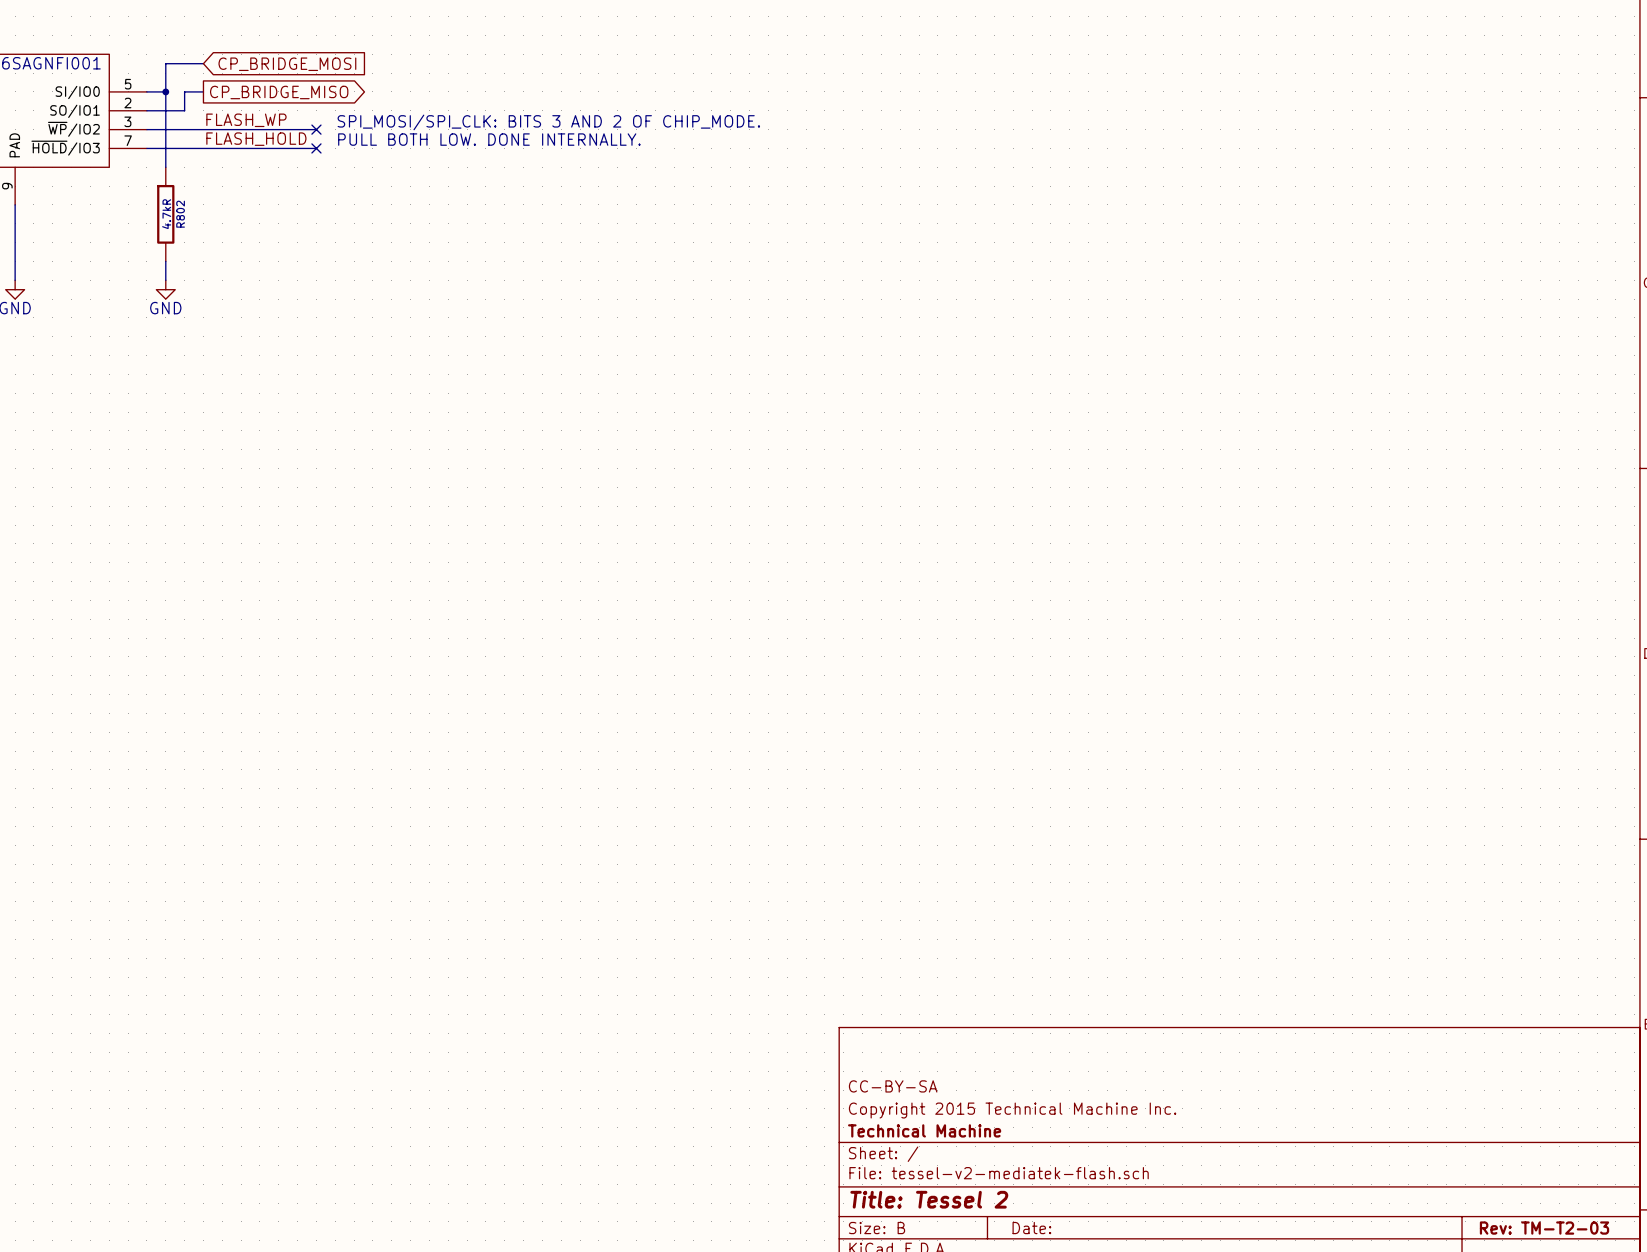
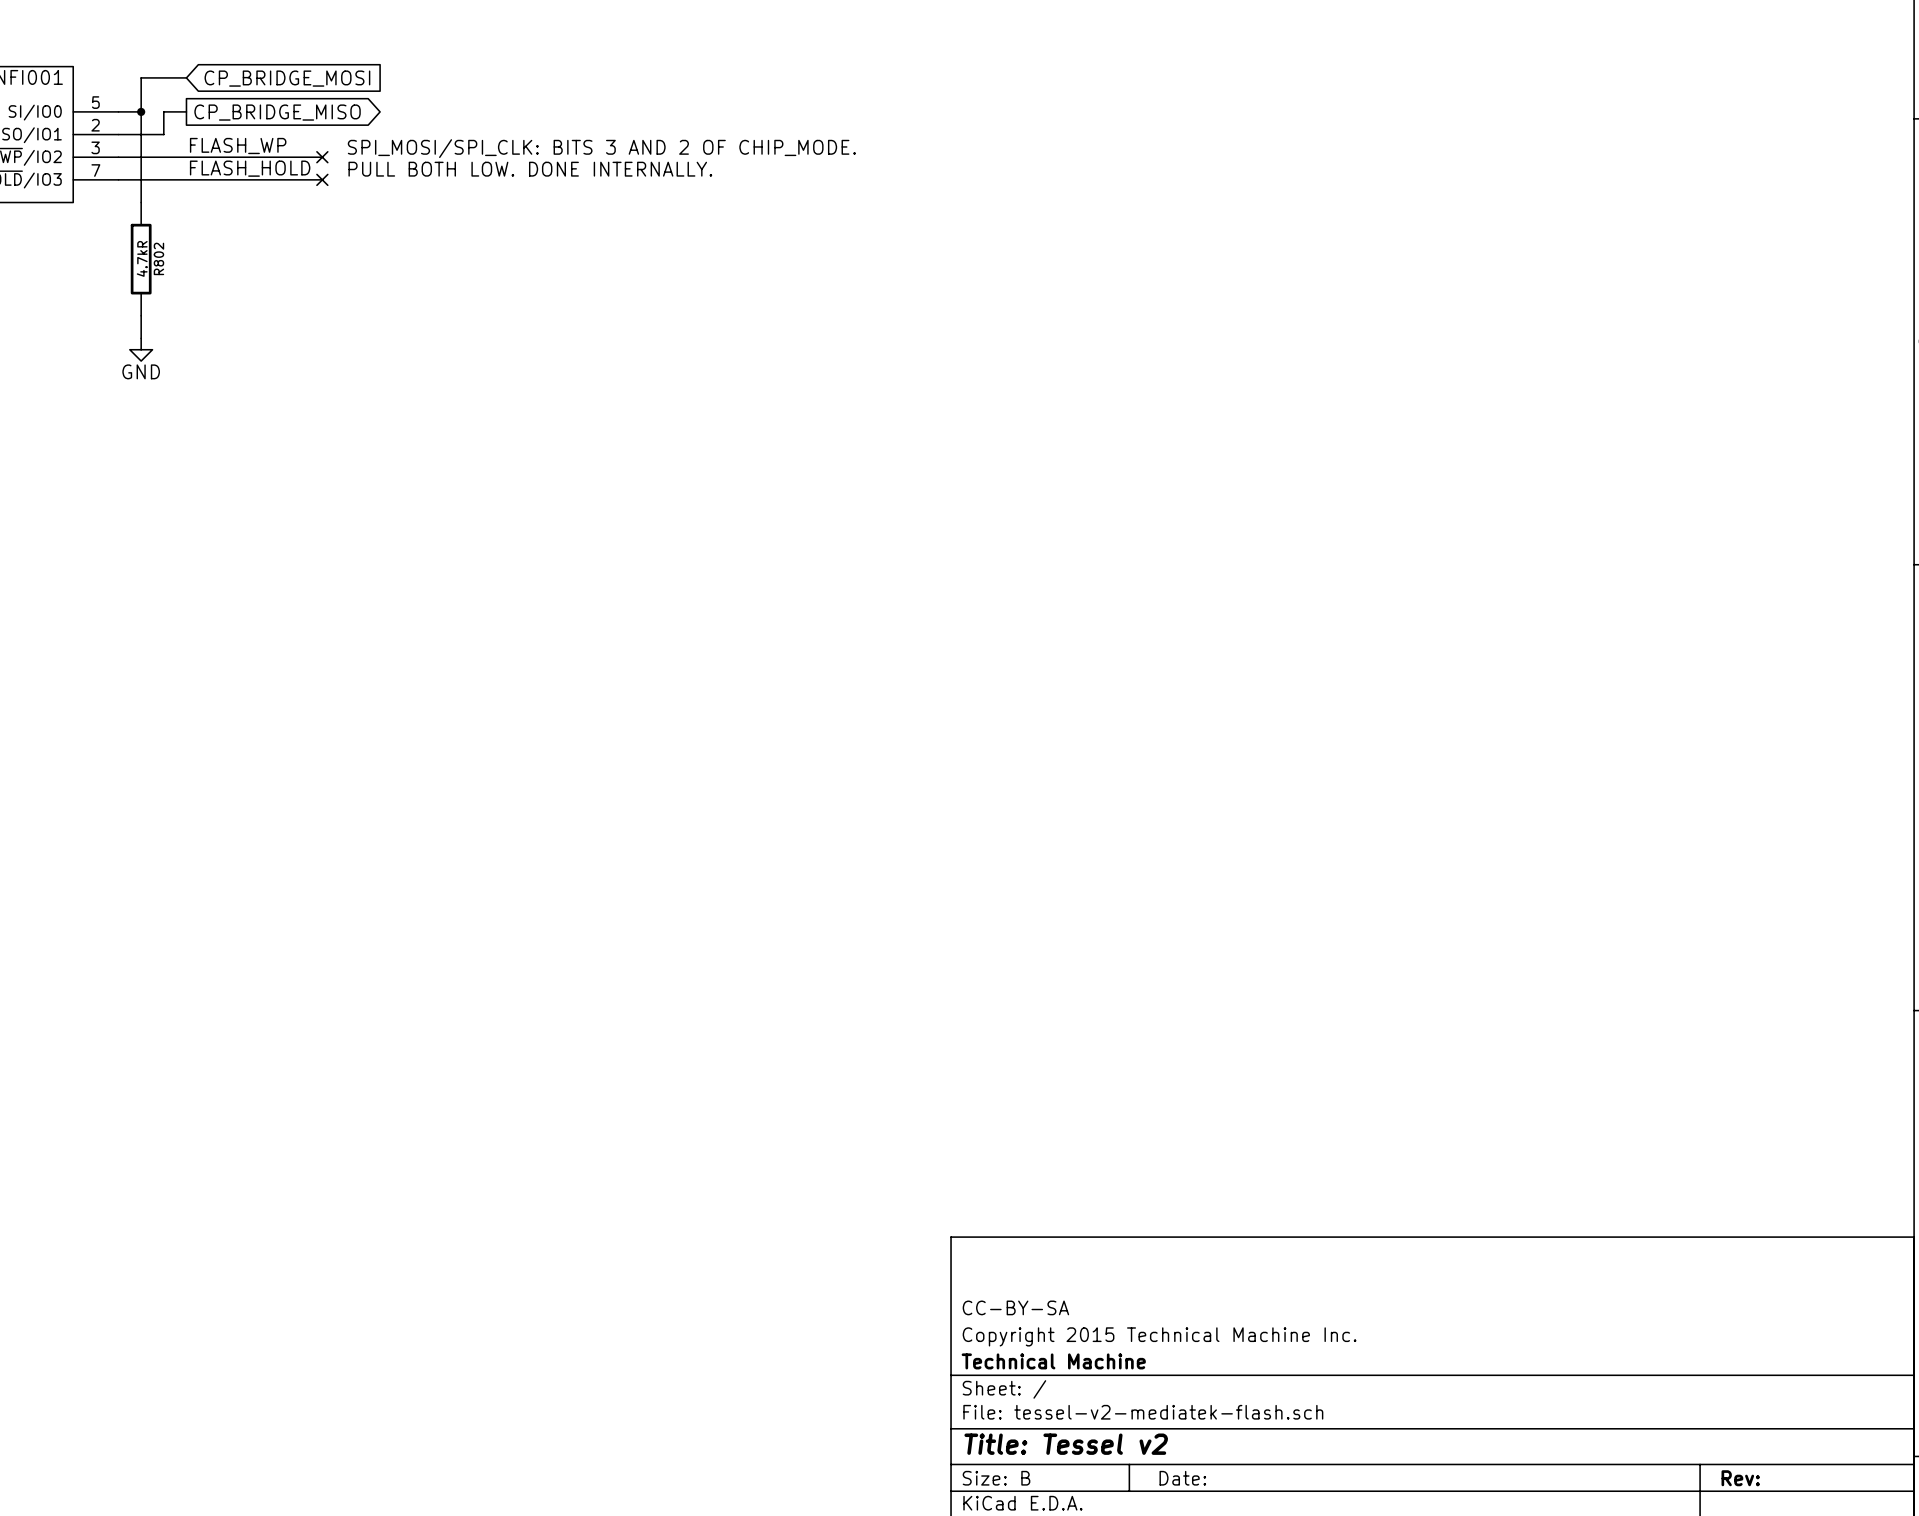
title block: Title: Tessel 2 (929, 1199) -> Title: Tessel v2 (1066, 1444)
title block: Rev: TM-T2-03 (1544, 1228) -> Rev: (1740, 1478)

